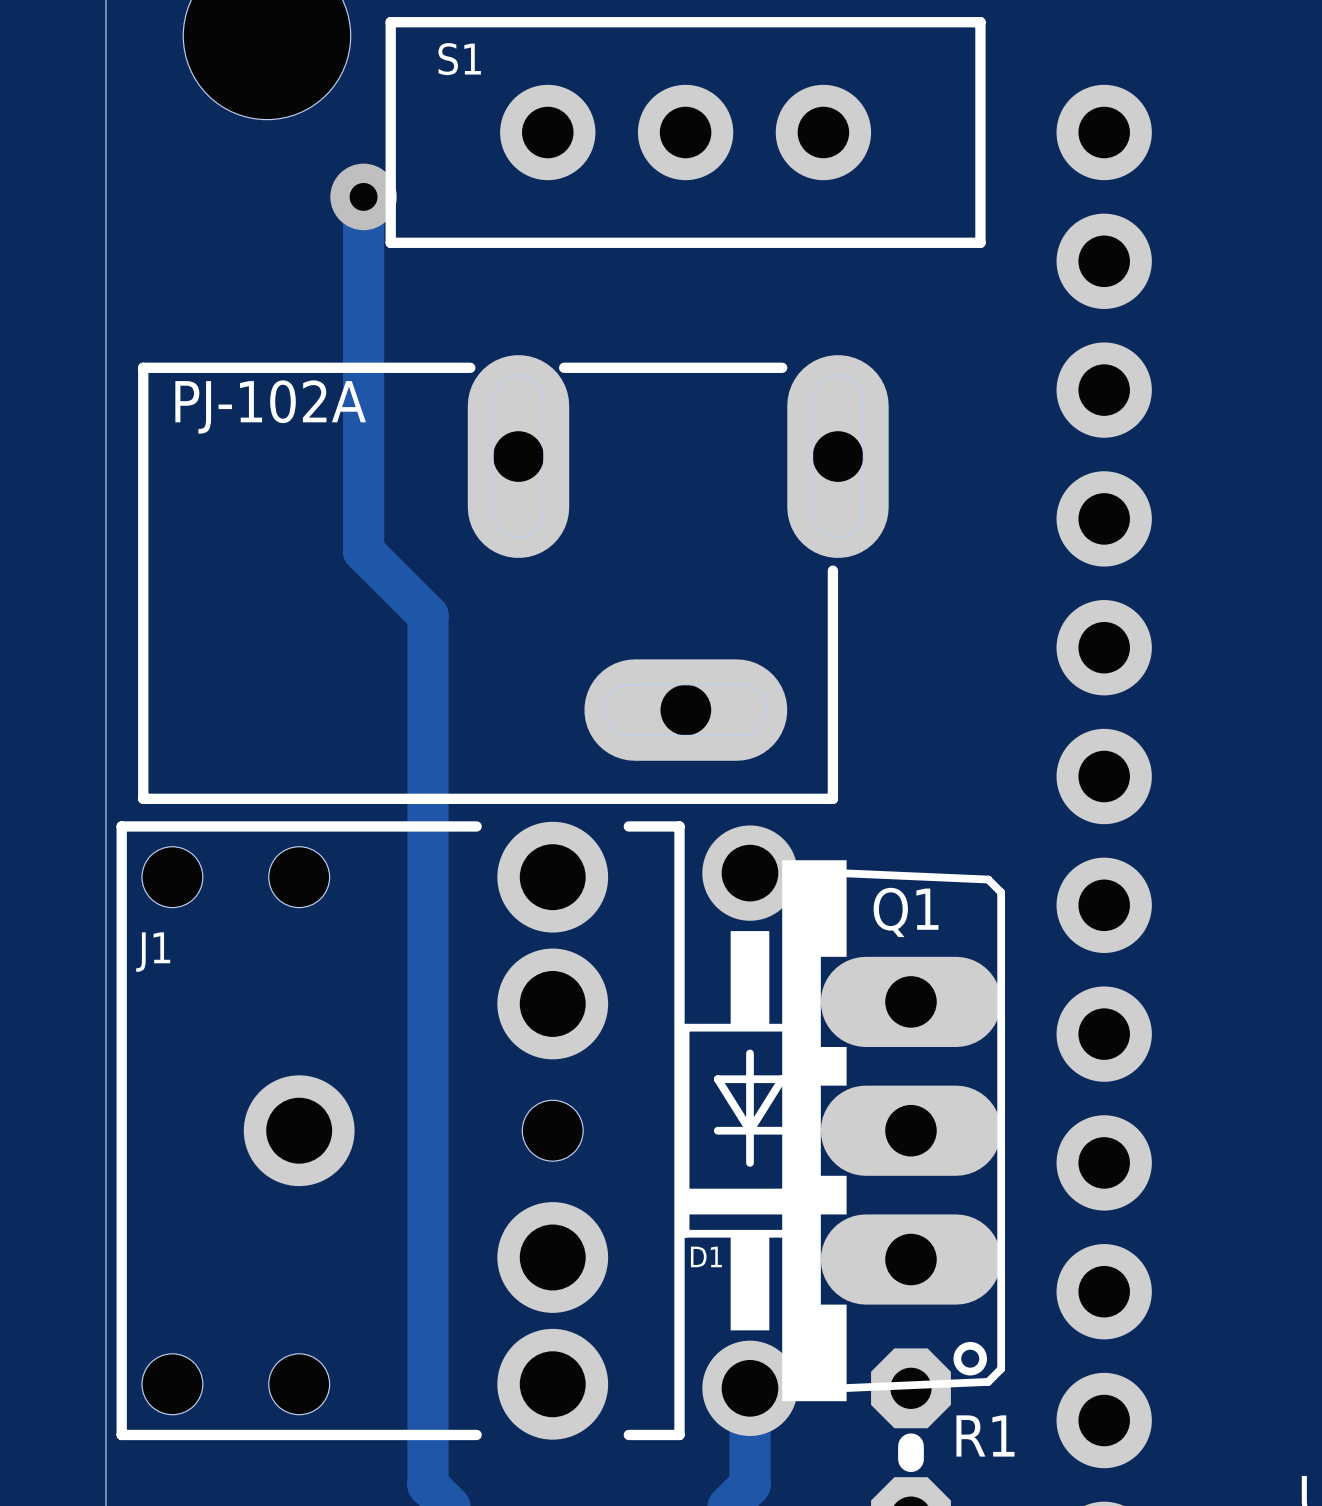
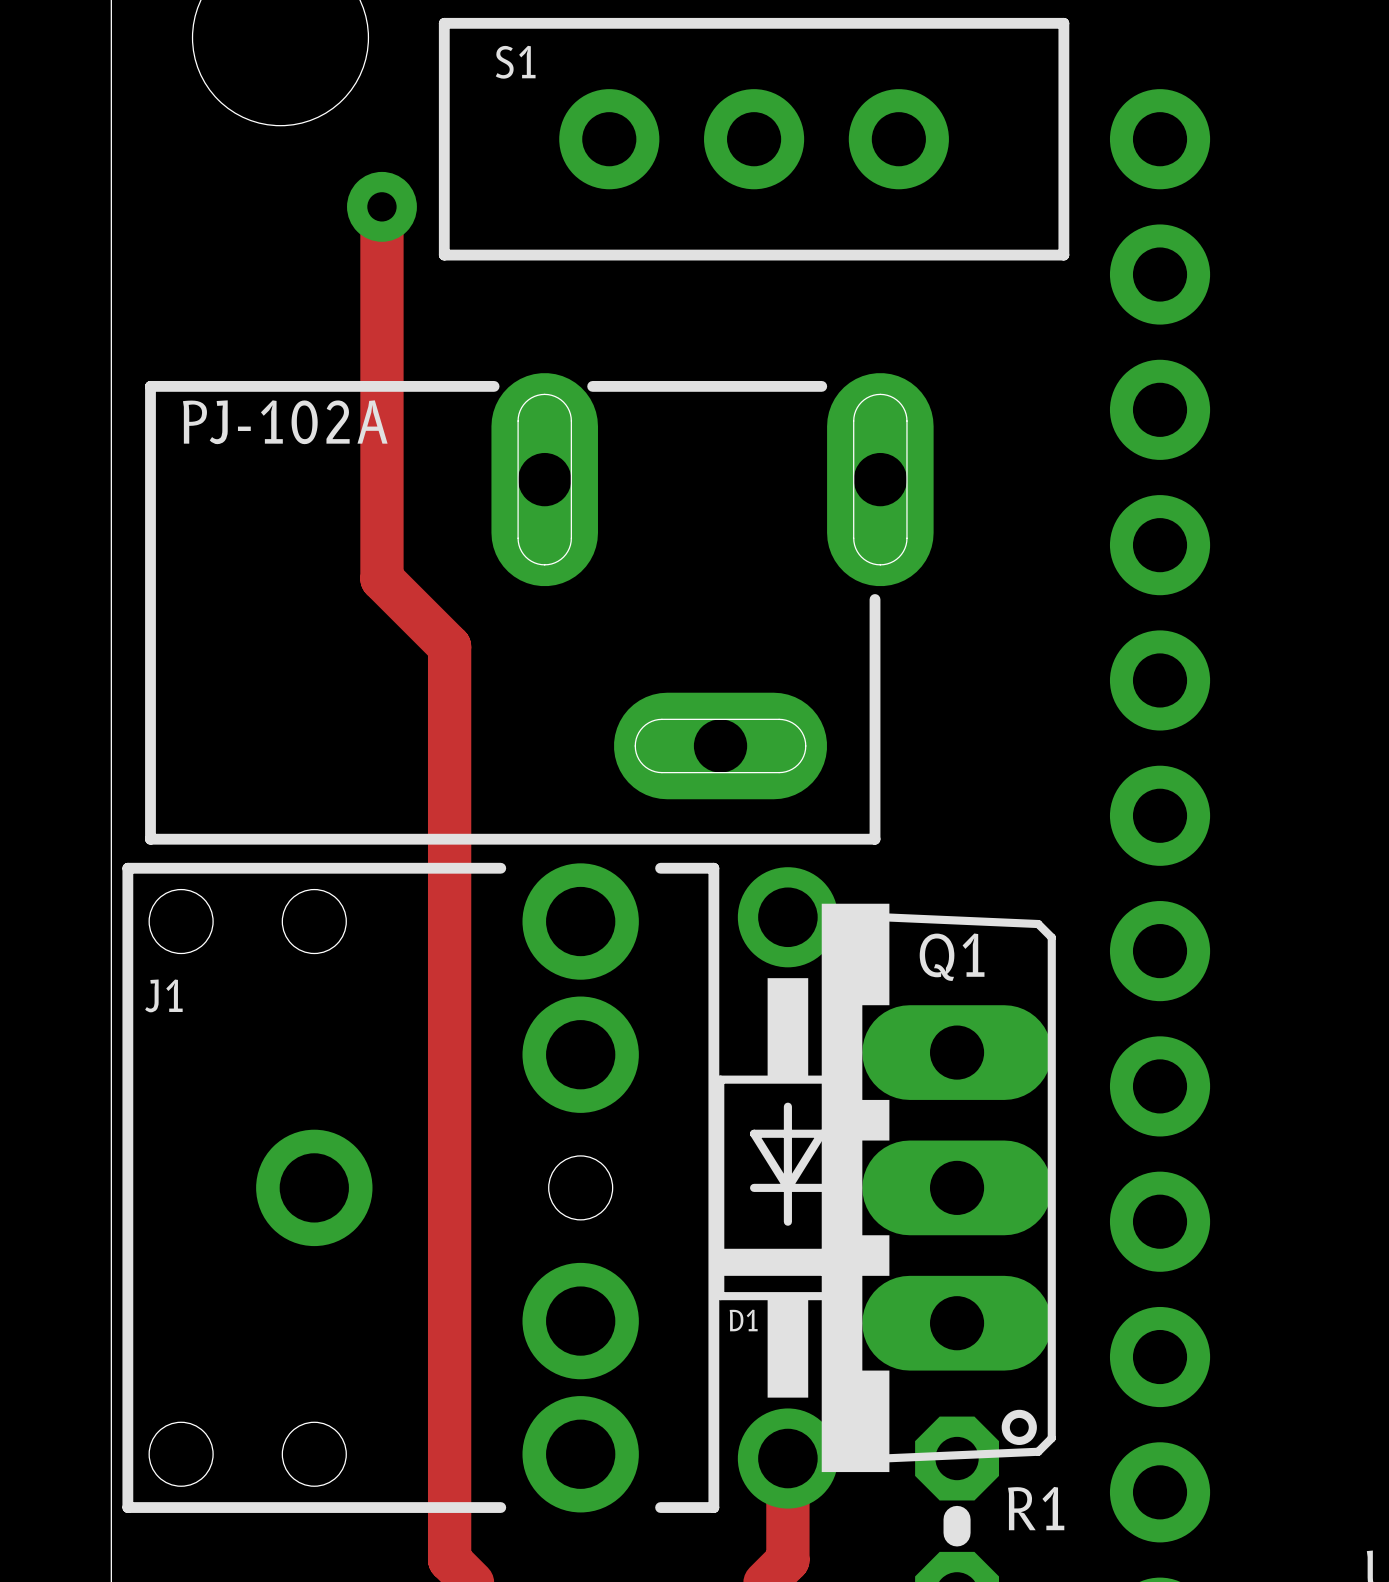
S1 position: (685, 132) -> (754, 139)

